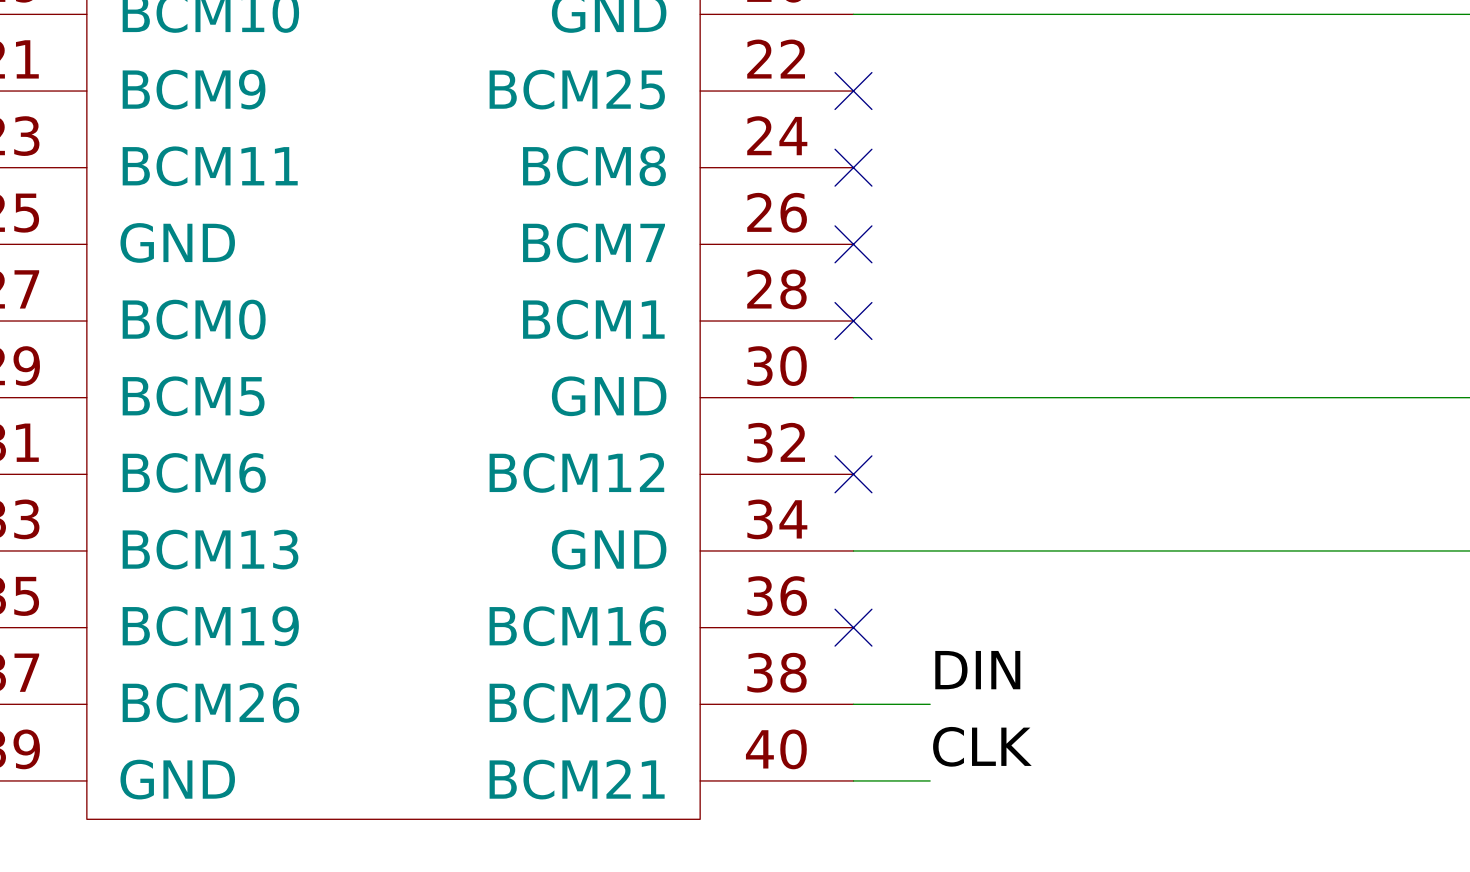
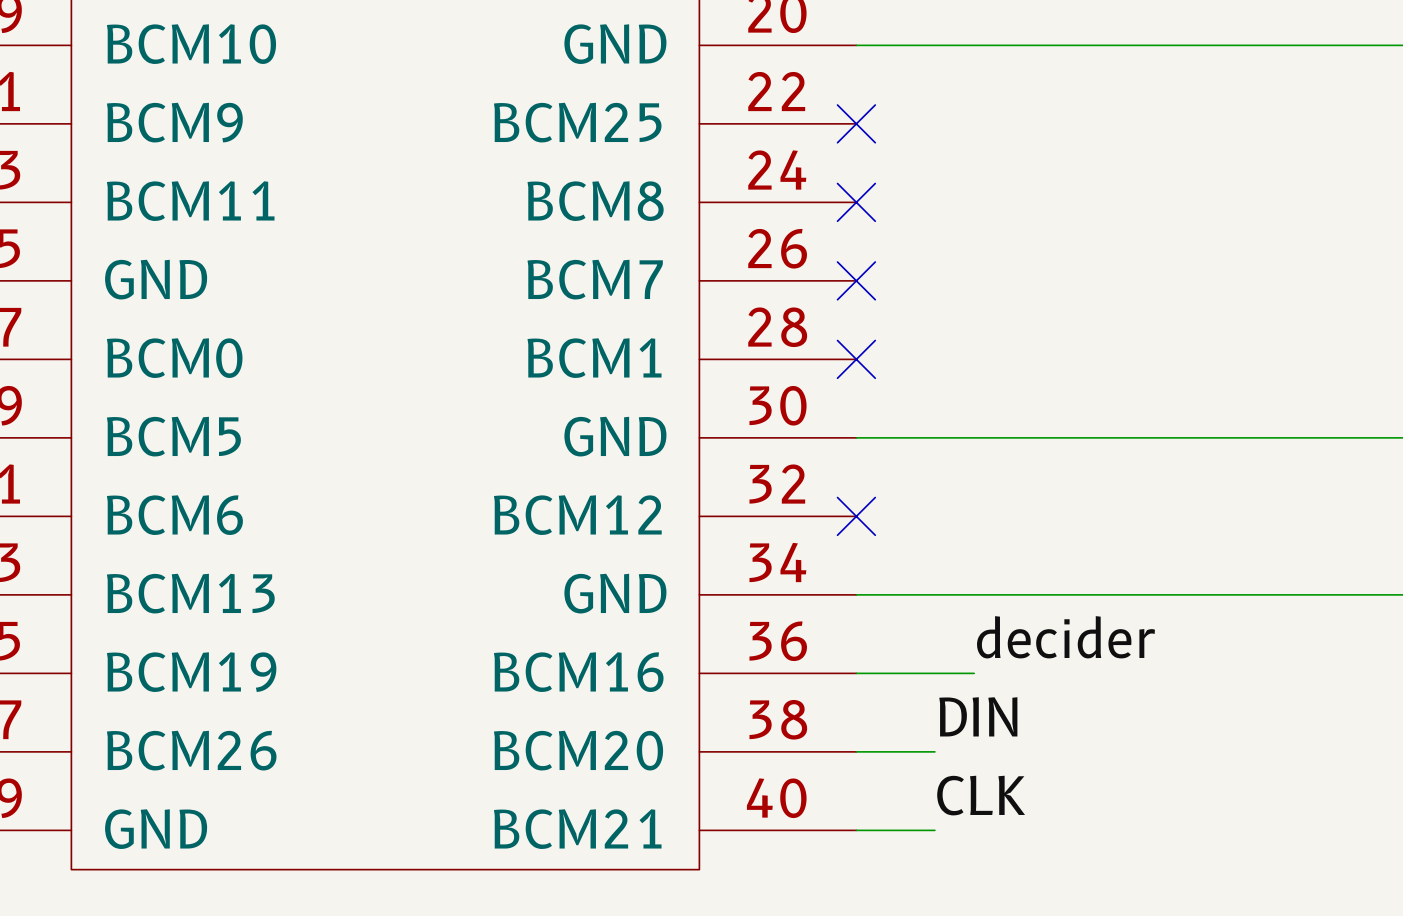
label: none -> decider (1065, 637)
wire: none -> (856, 673) (974, 673)
no-connect mark: (853, 627) -> none

